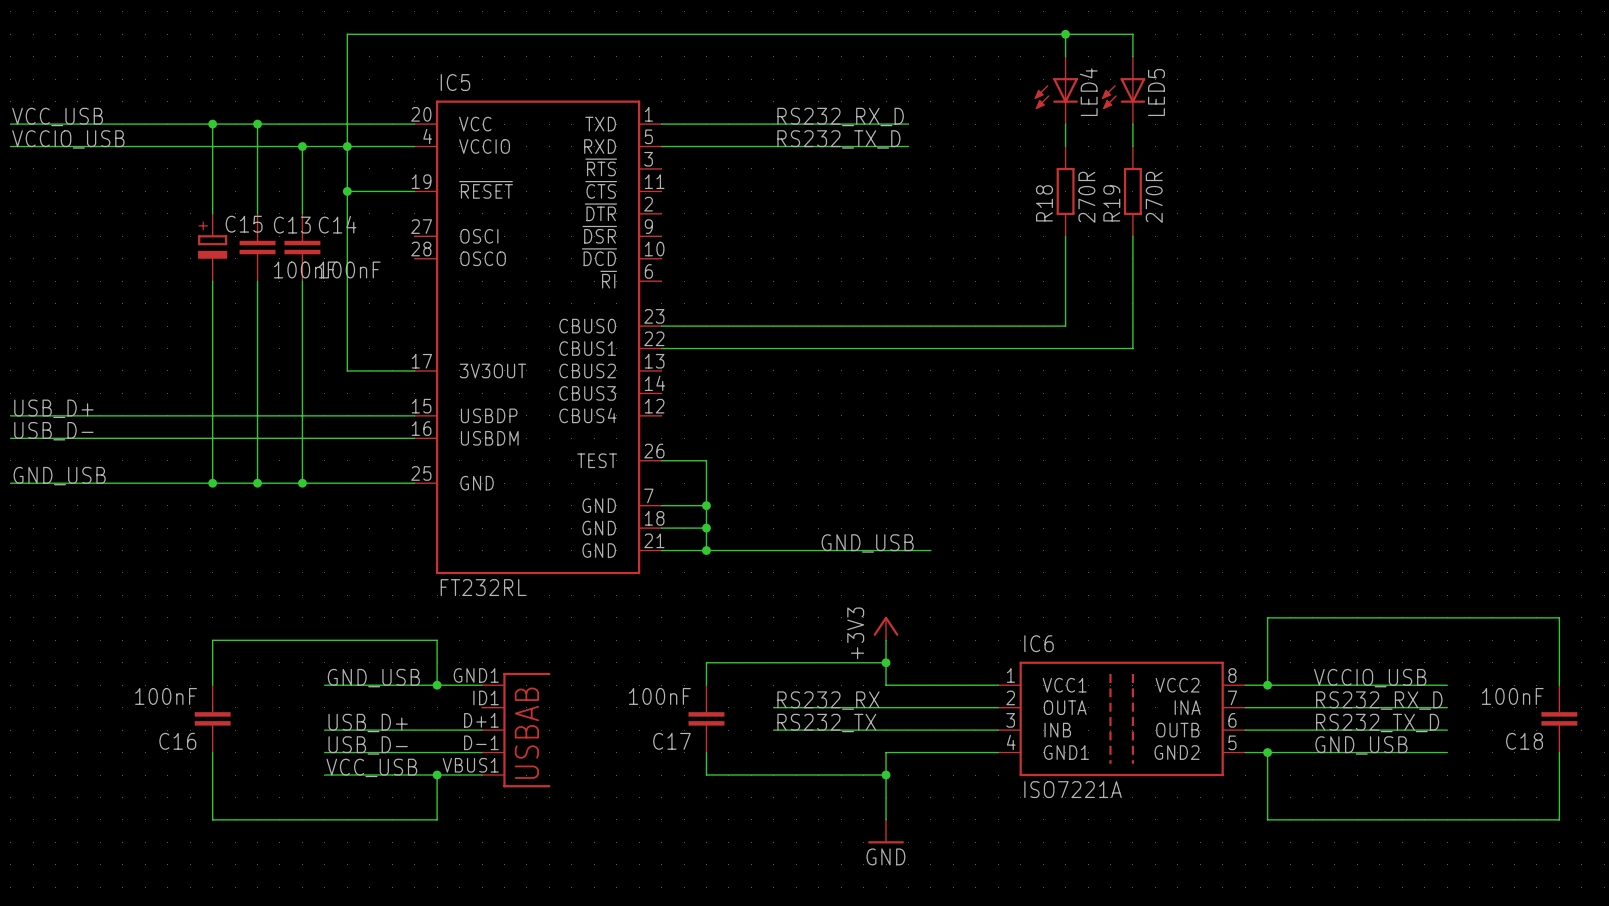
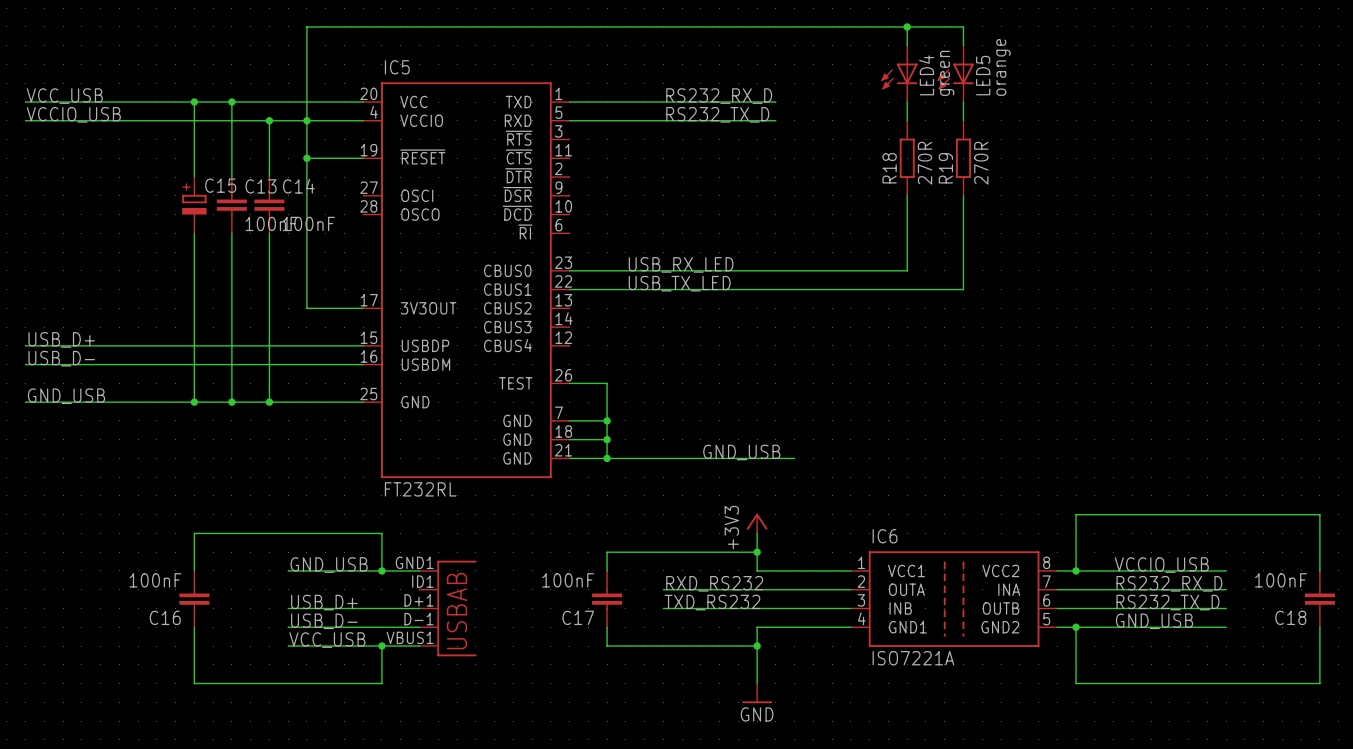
LED5 value: none -> orange (1003, 67)
LED4 value: none -> green (947, 73)
label: none -> USB_RX_LED (681, 264)
label: none -> USB_TX_LED (679, 283)
label: RS232_RX (828, 700) -> RXD_RS232 (714, 583)
label: RS232_TX (826, 723) -> TXD_RS232 (712, 602)

